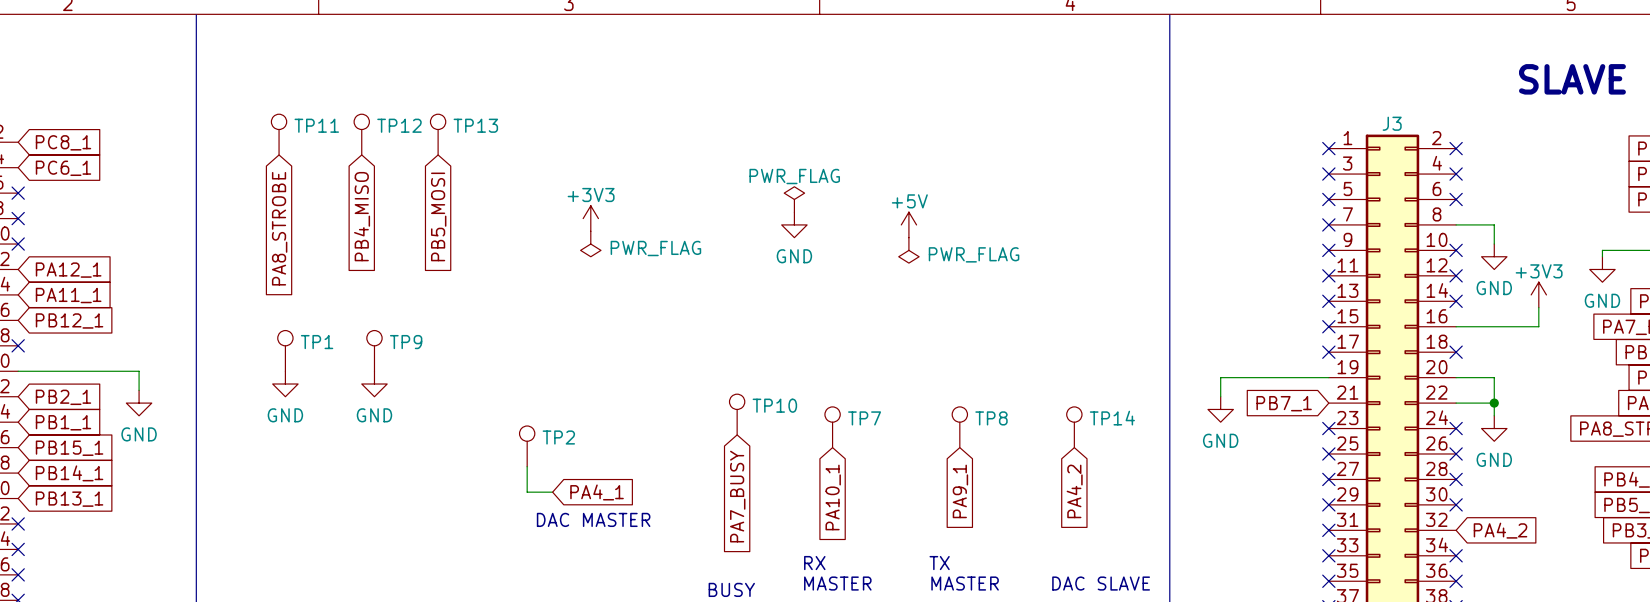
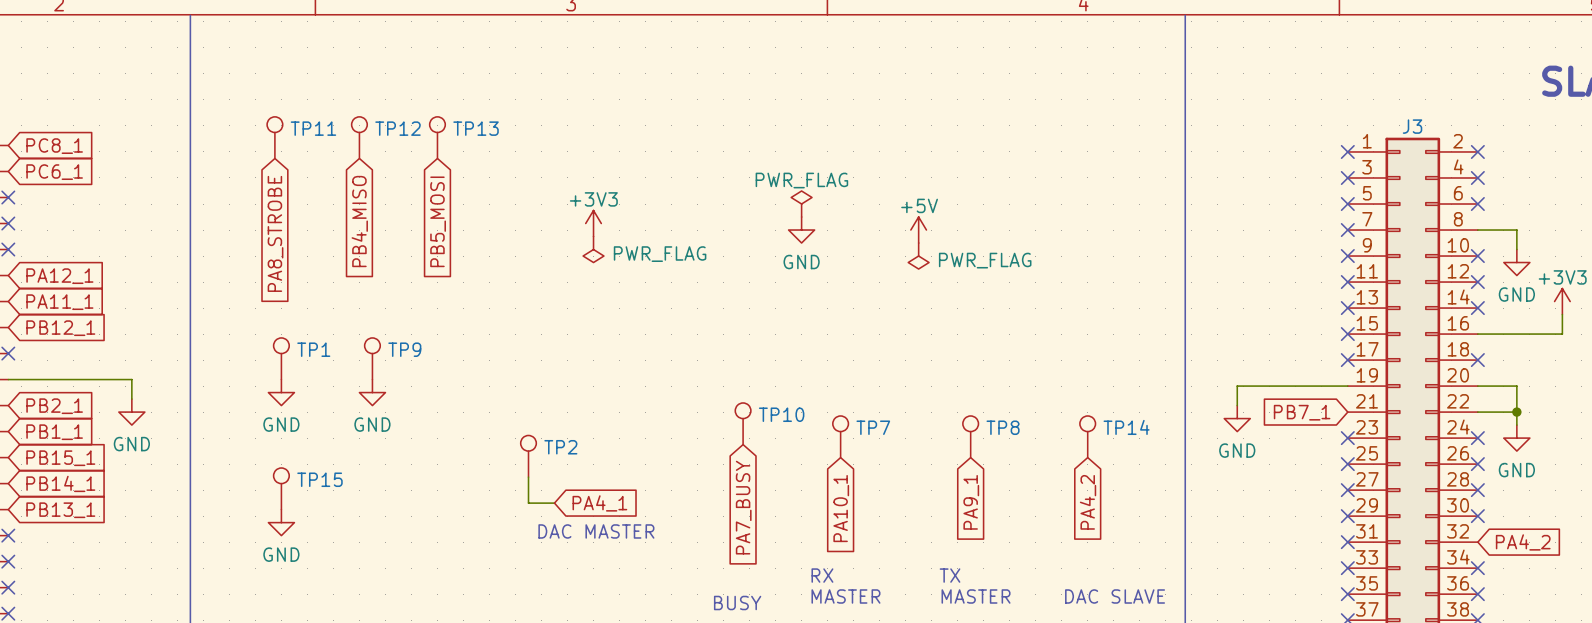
TP15: none -> (281, 488)
power symbol: none -> GND (281, 522)

